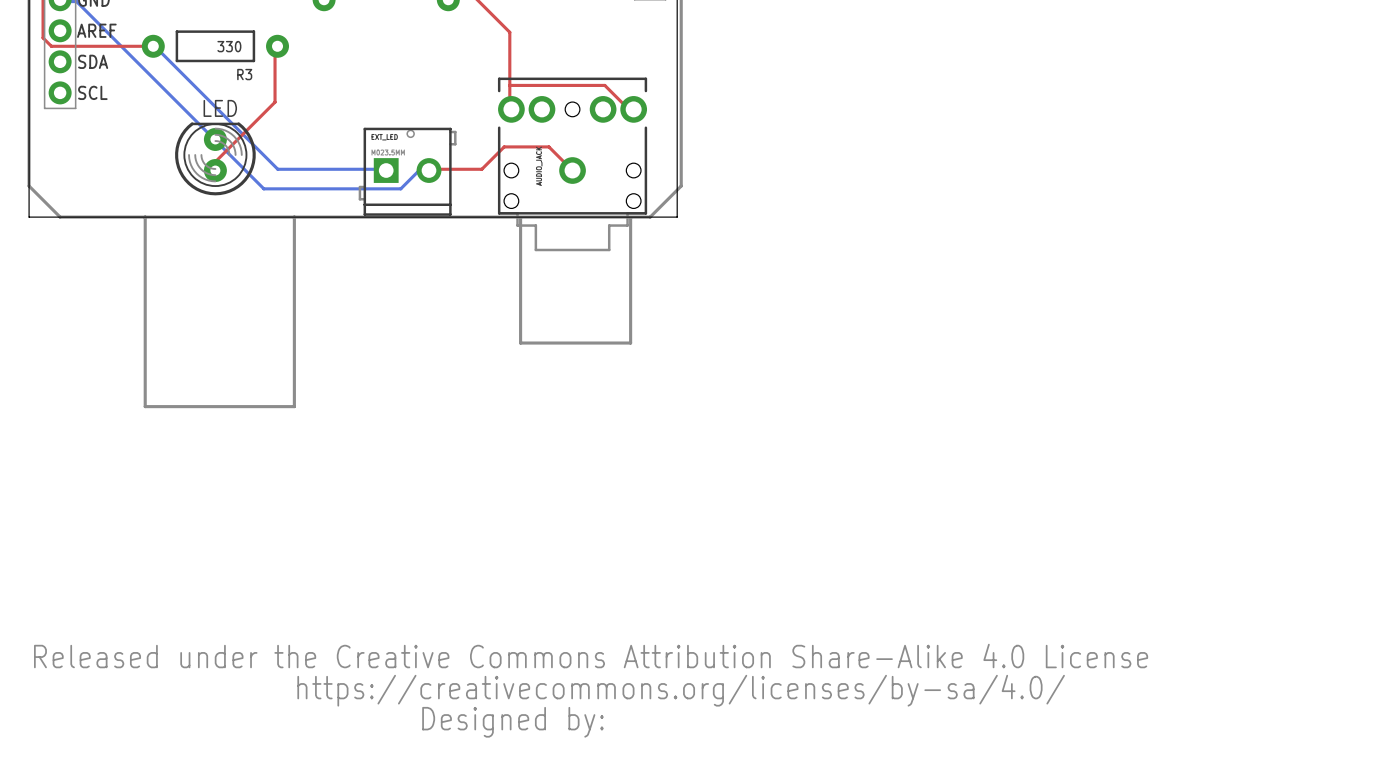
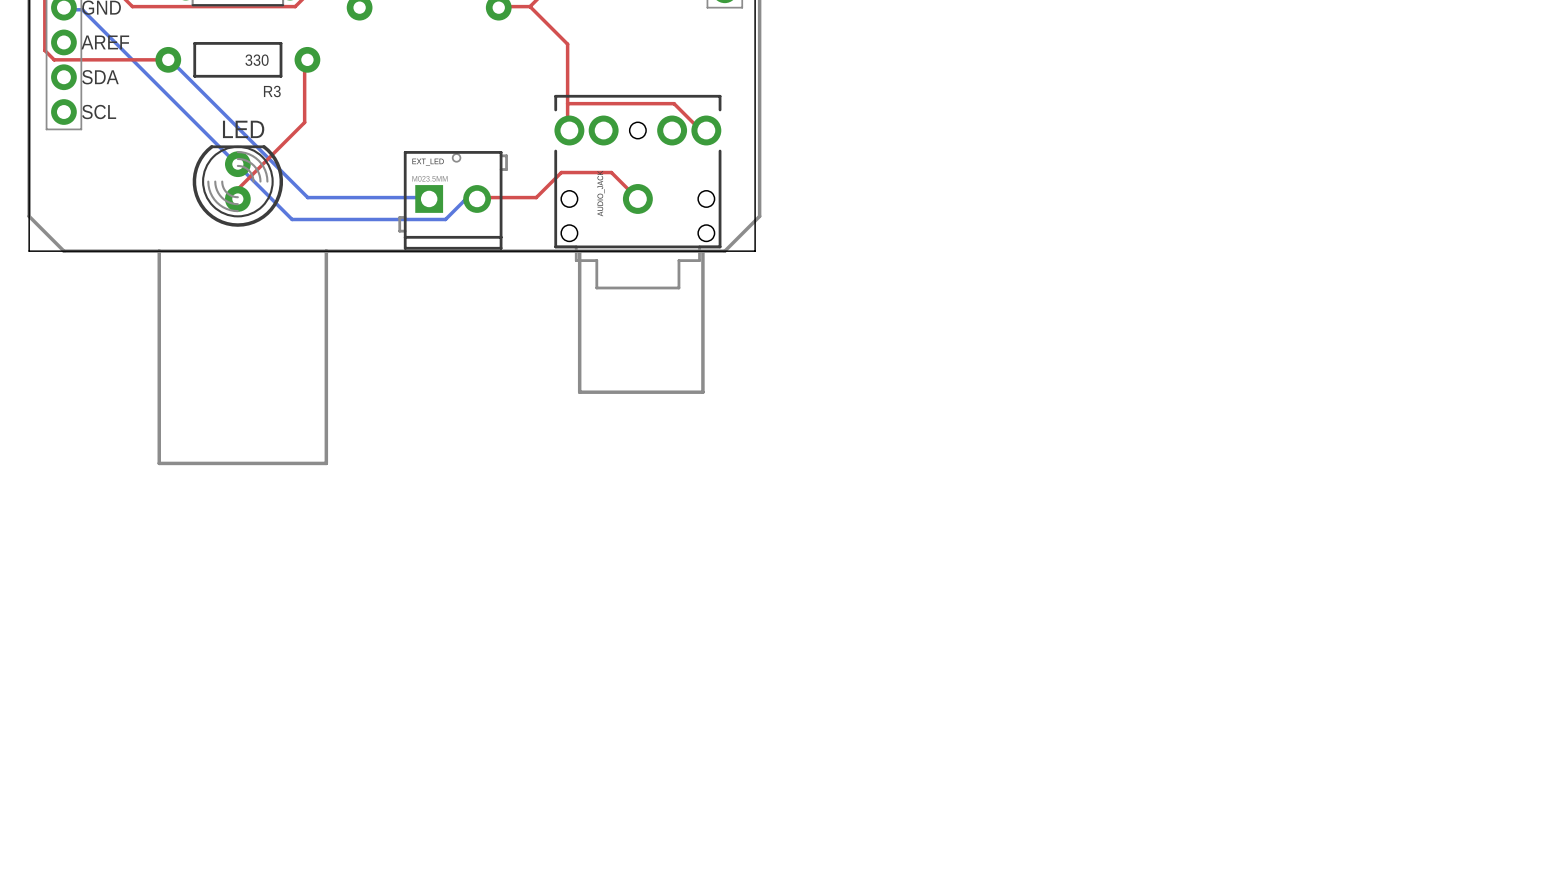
drawing: [34, 643, 1149, 738] -> none

